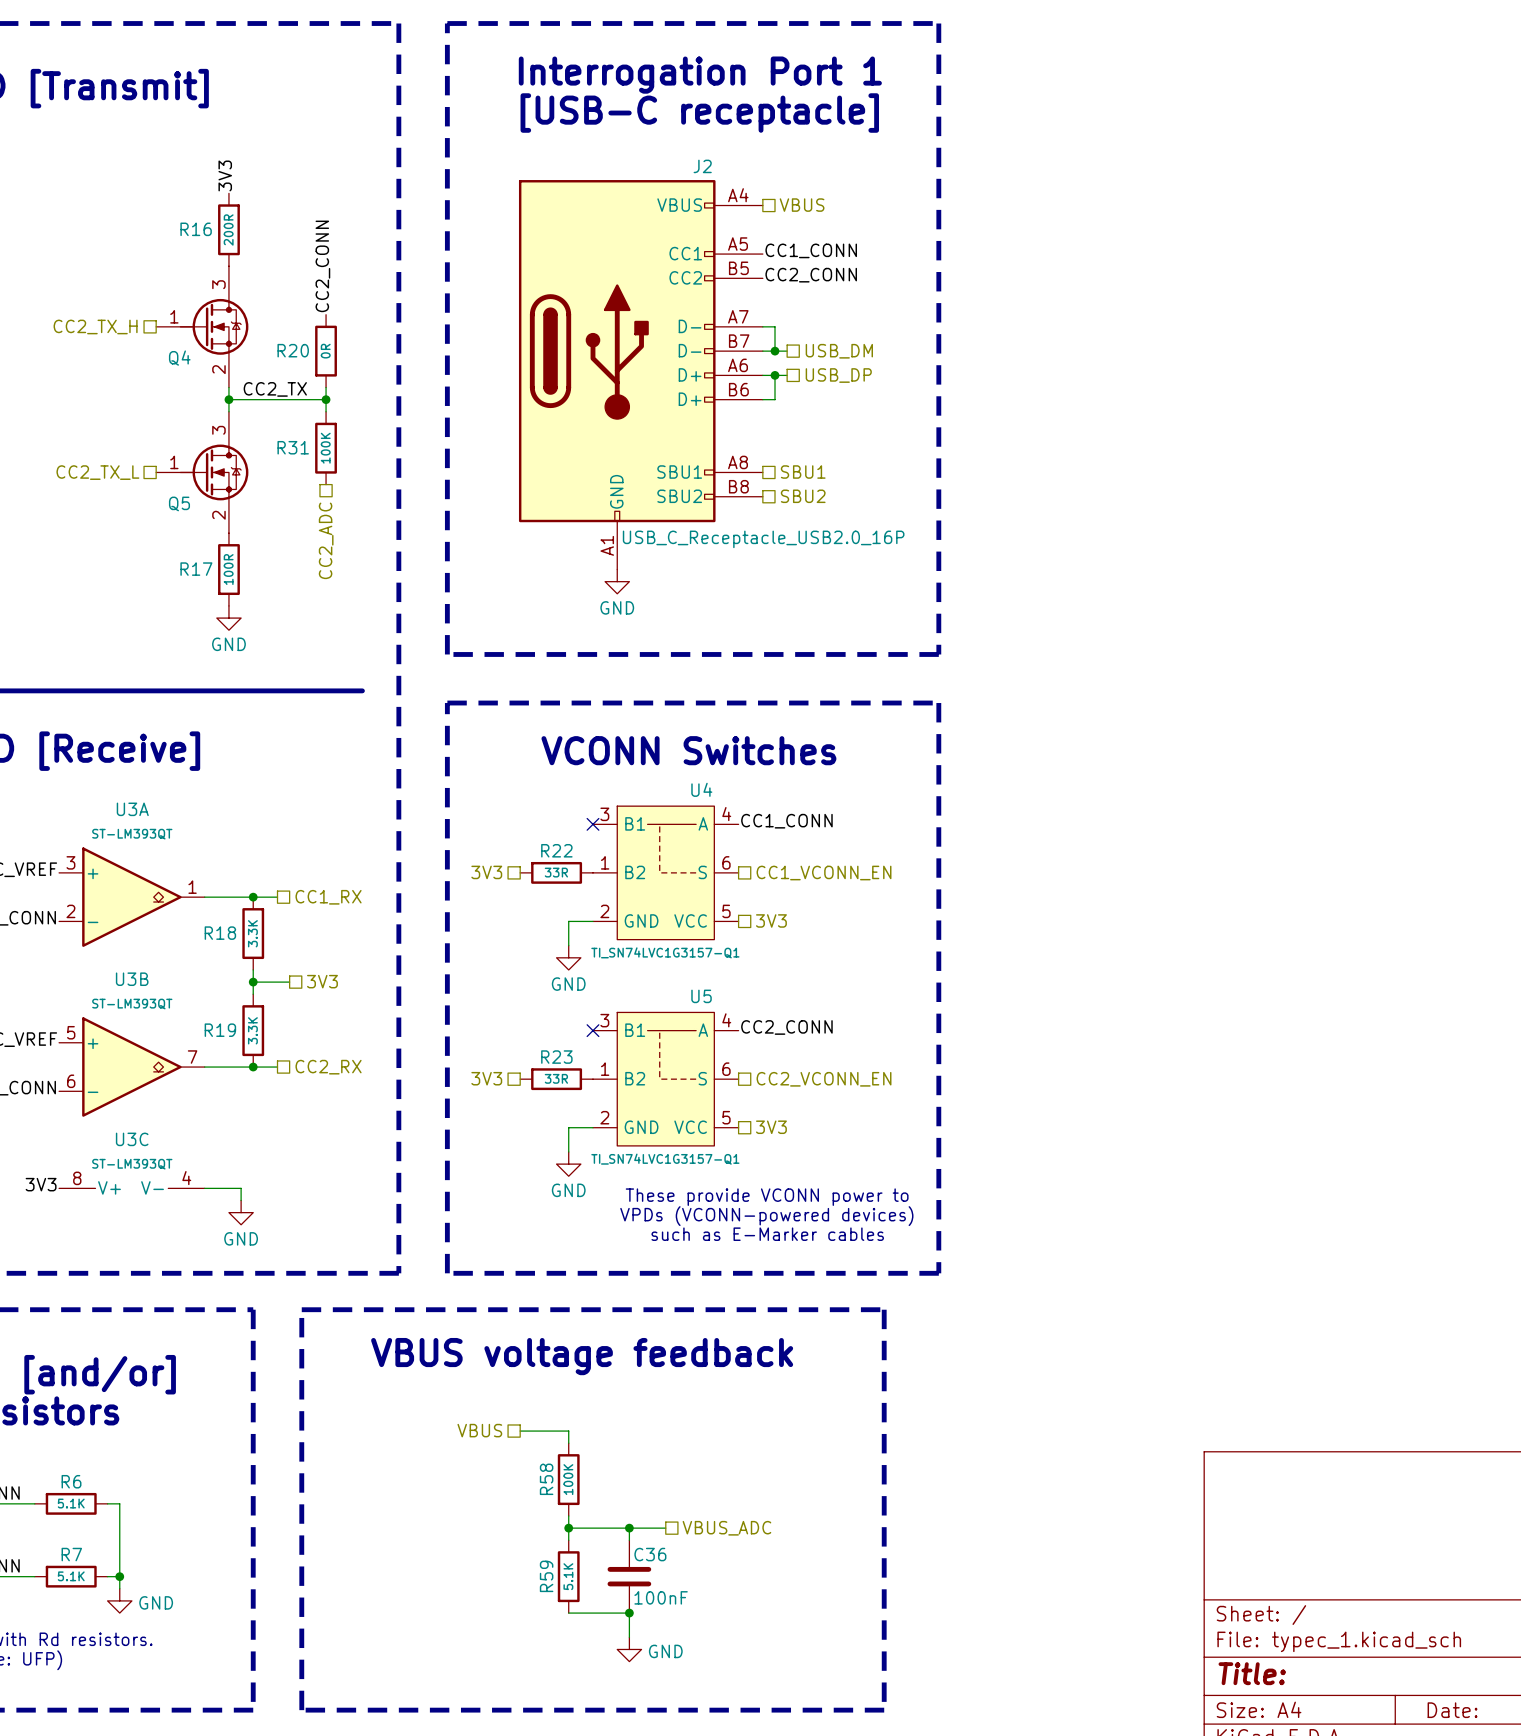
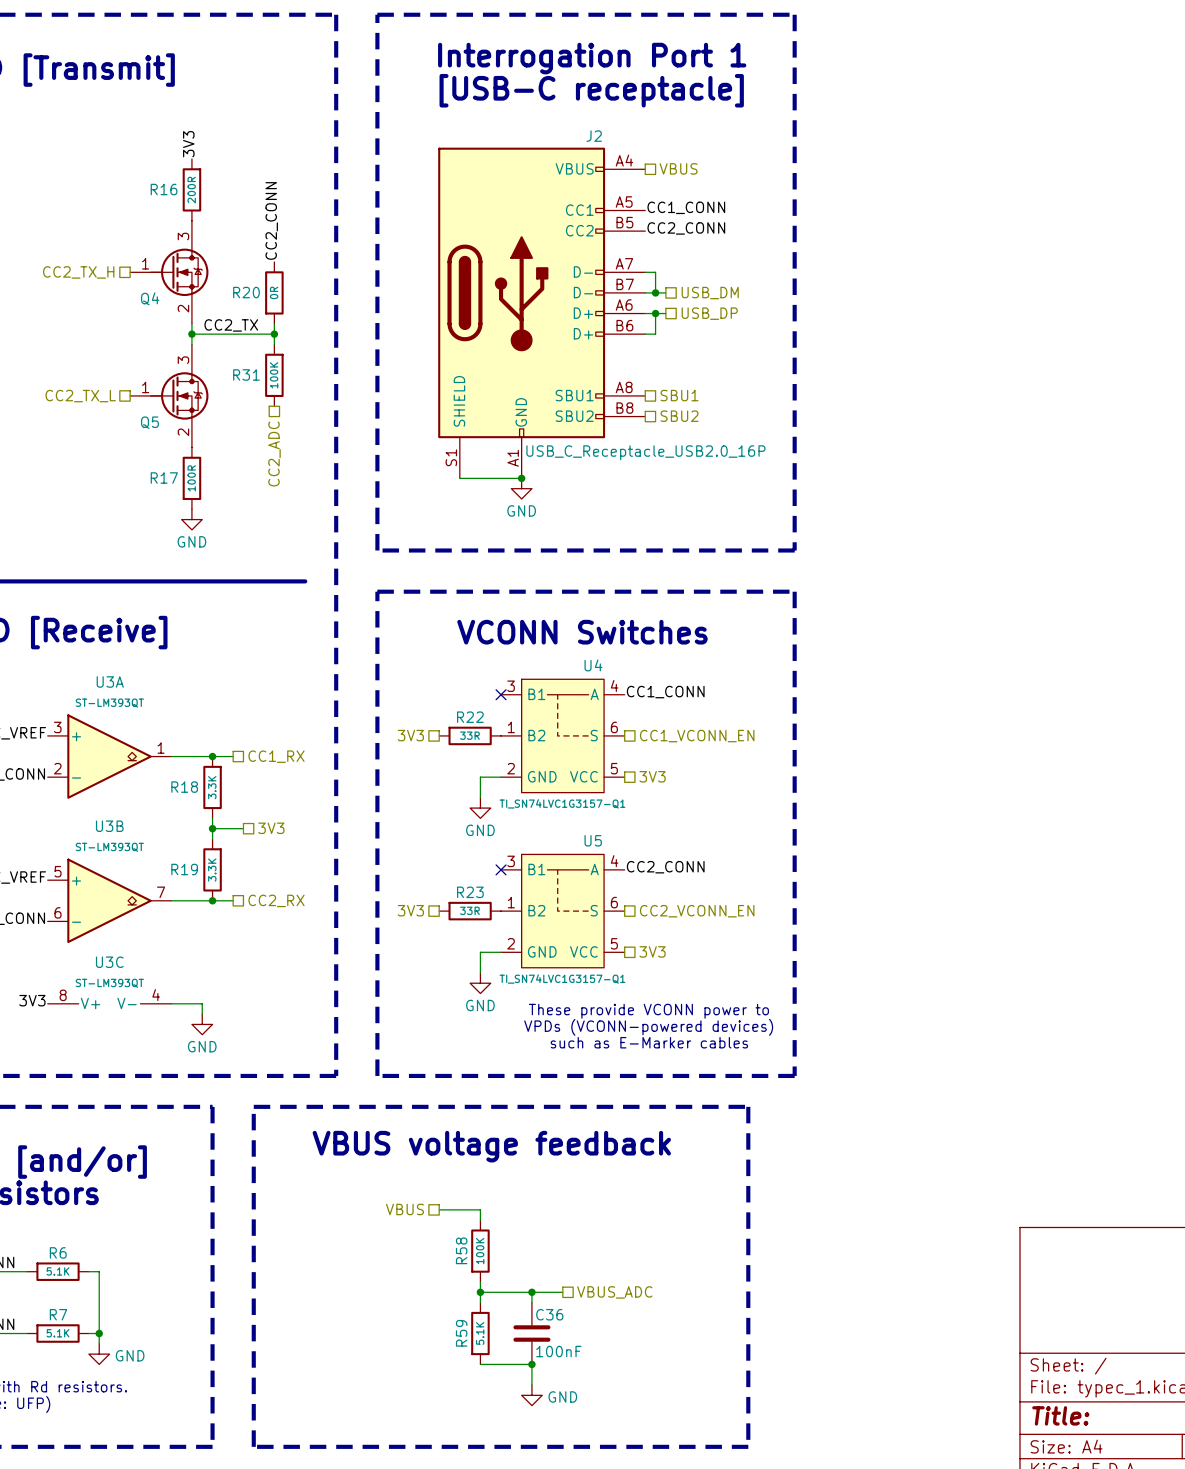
J2 symbol: [518, 180, 763, 570] -> [438, 147, 646, 479]
wire: none -> (459, 478) (521, 478)
junction: none -> (521, 478)

